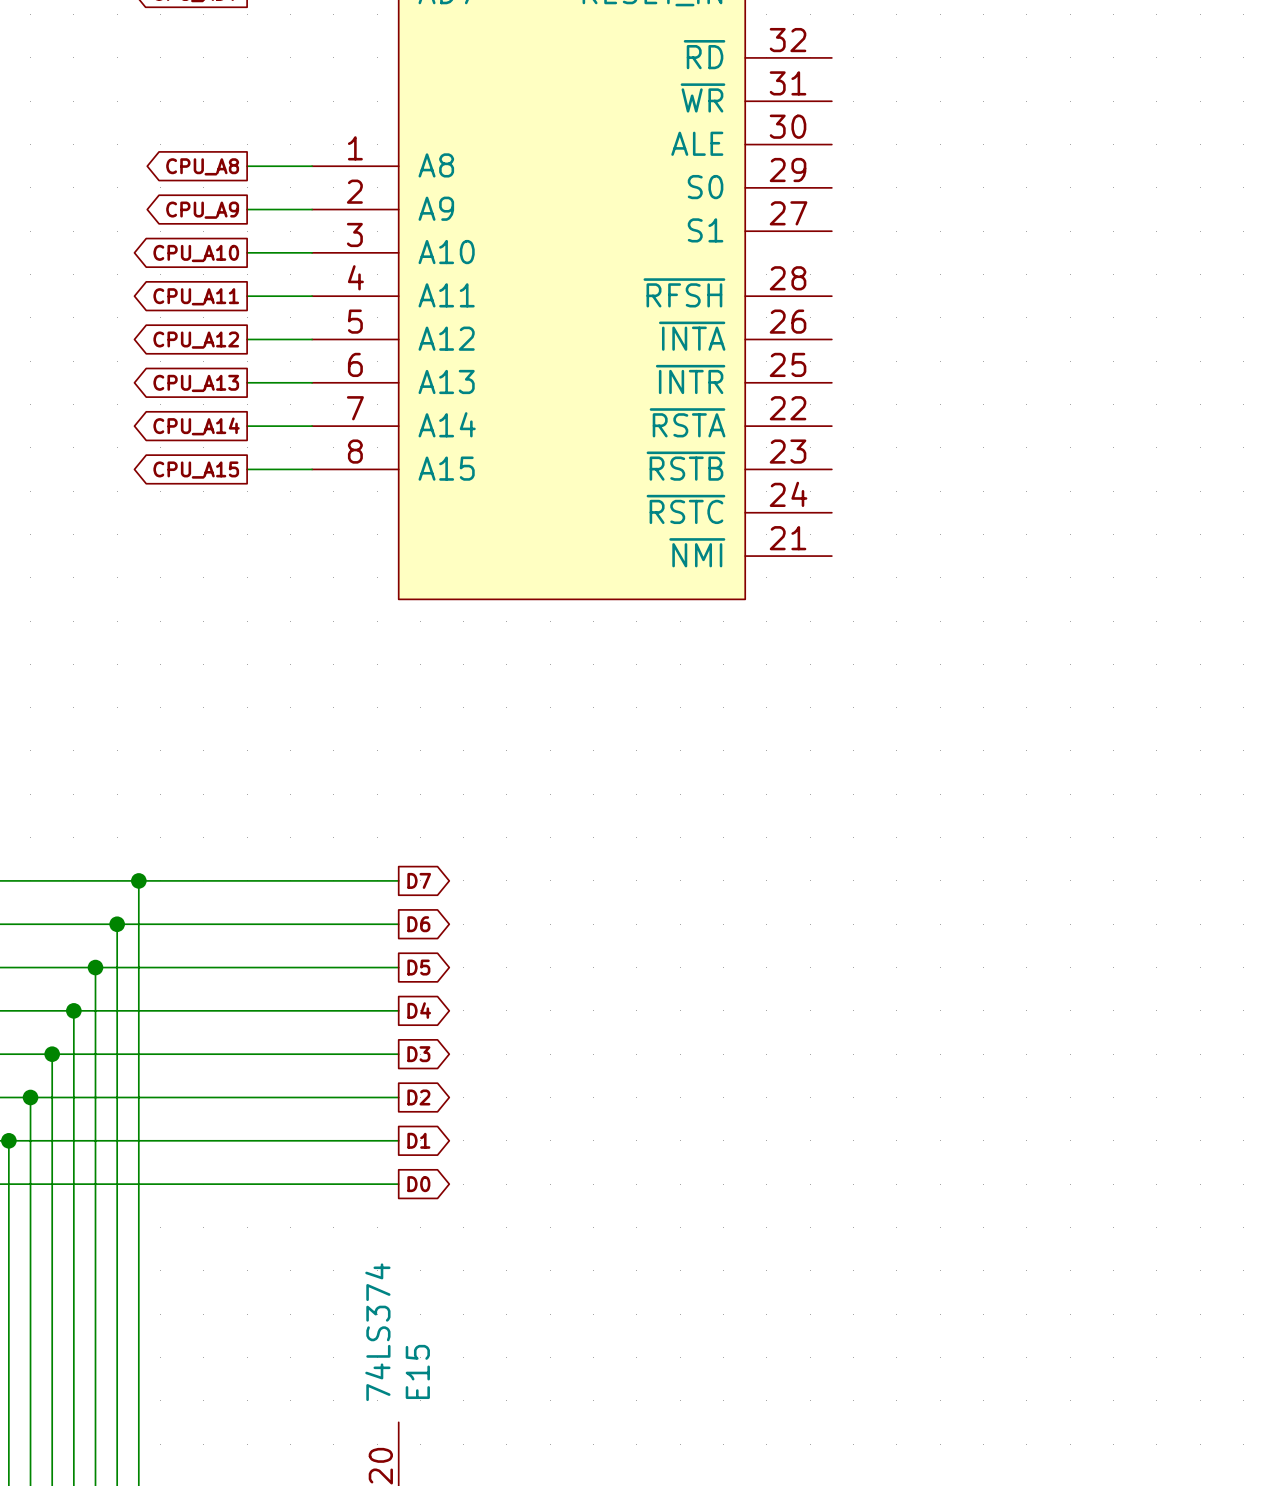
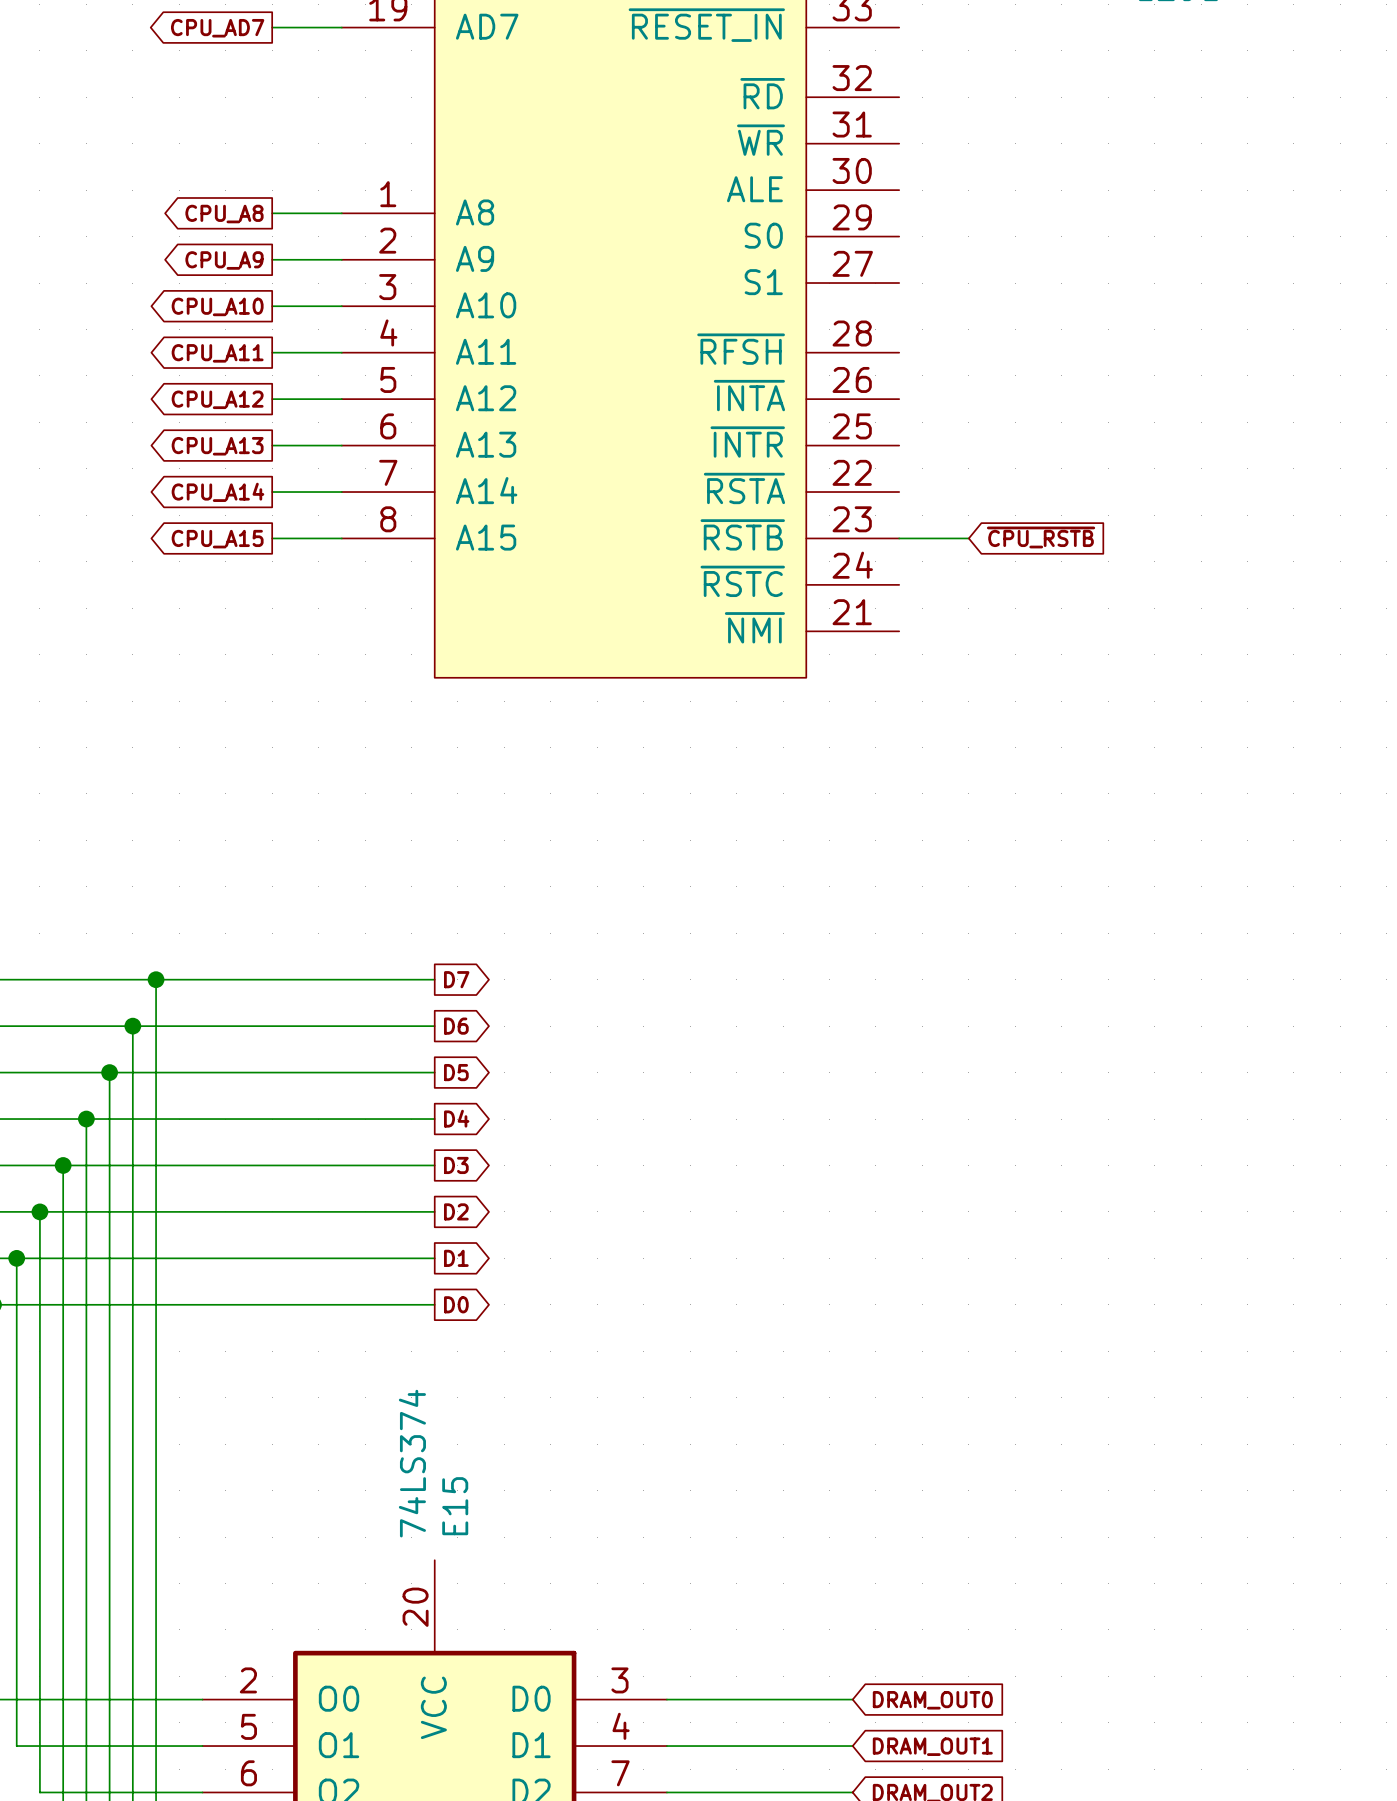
global label: none -> ~{CPU_RSTB} (1041, 537)
wire: none -> (899, 538) (968, 538)

